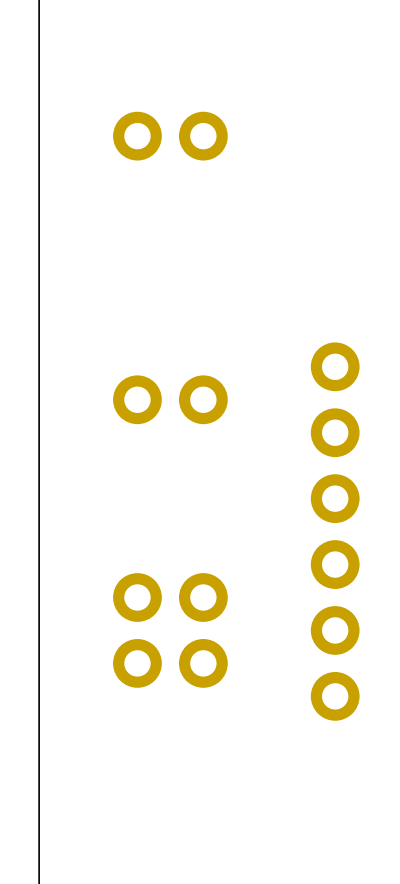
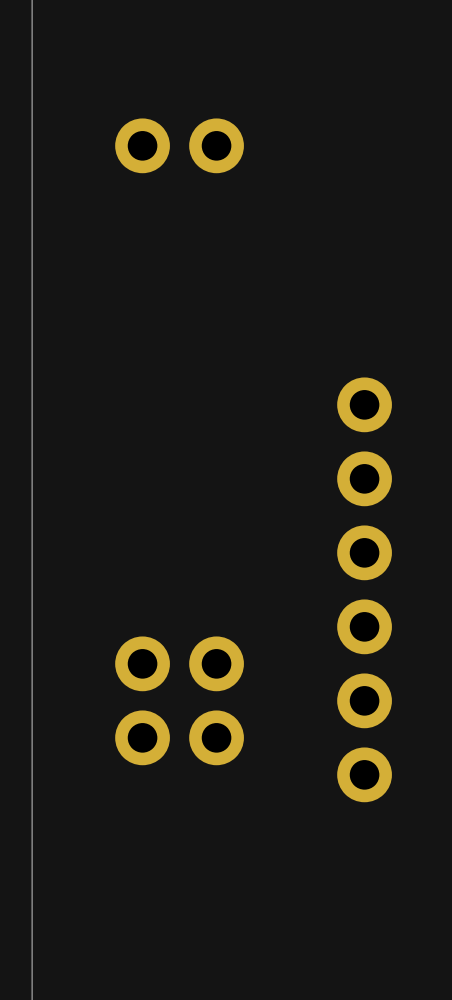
part: (170, 399) -> none

